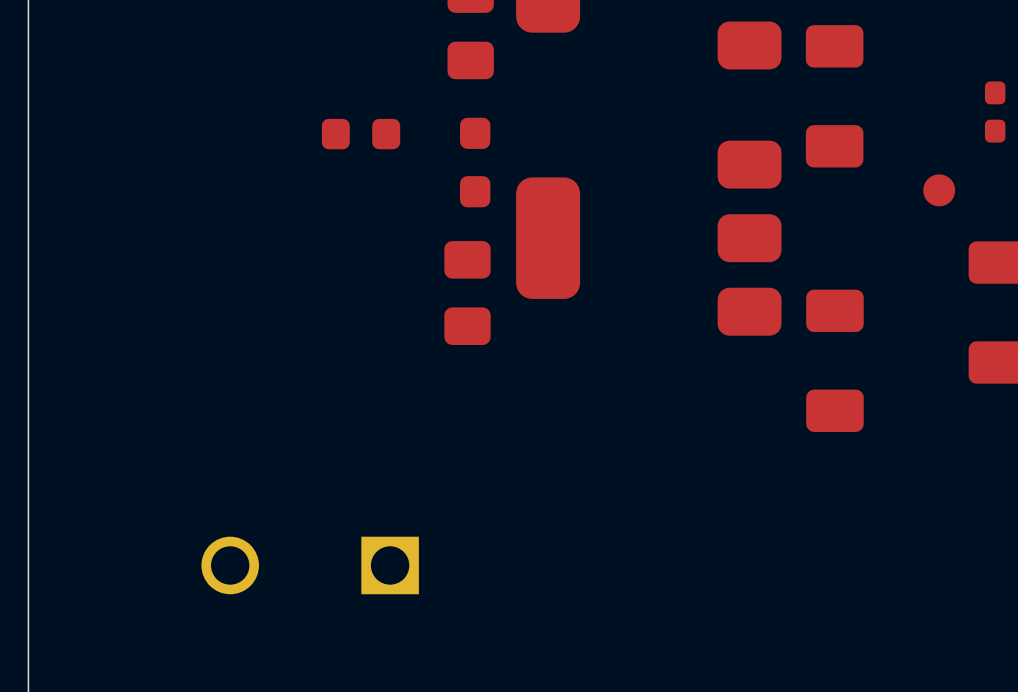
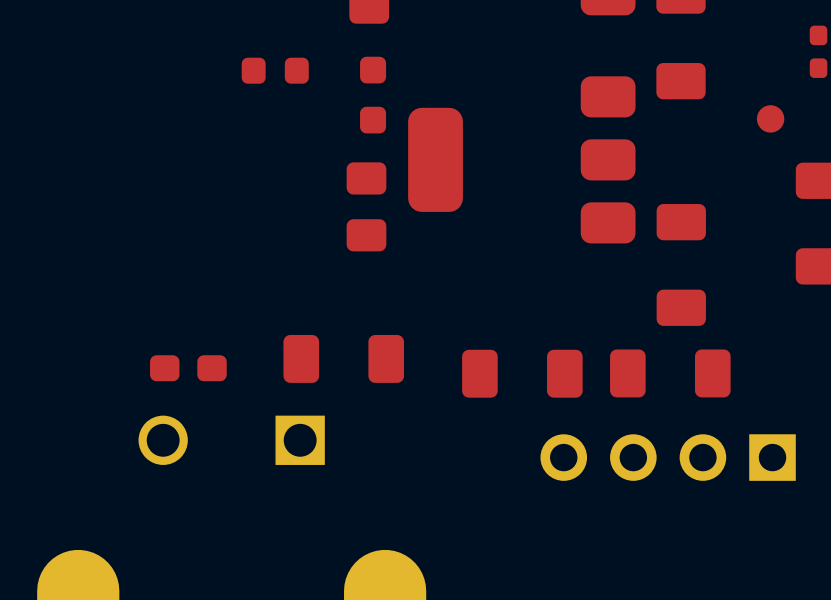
part: none -> (343, 358)
part: none -> (188, 368)
part: none -> (522, 373)
part: none -> (670, 373)
part: none -> (668, 457)

